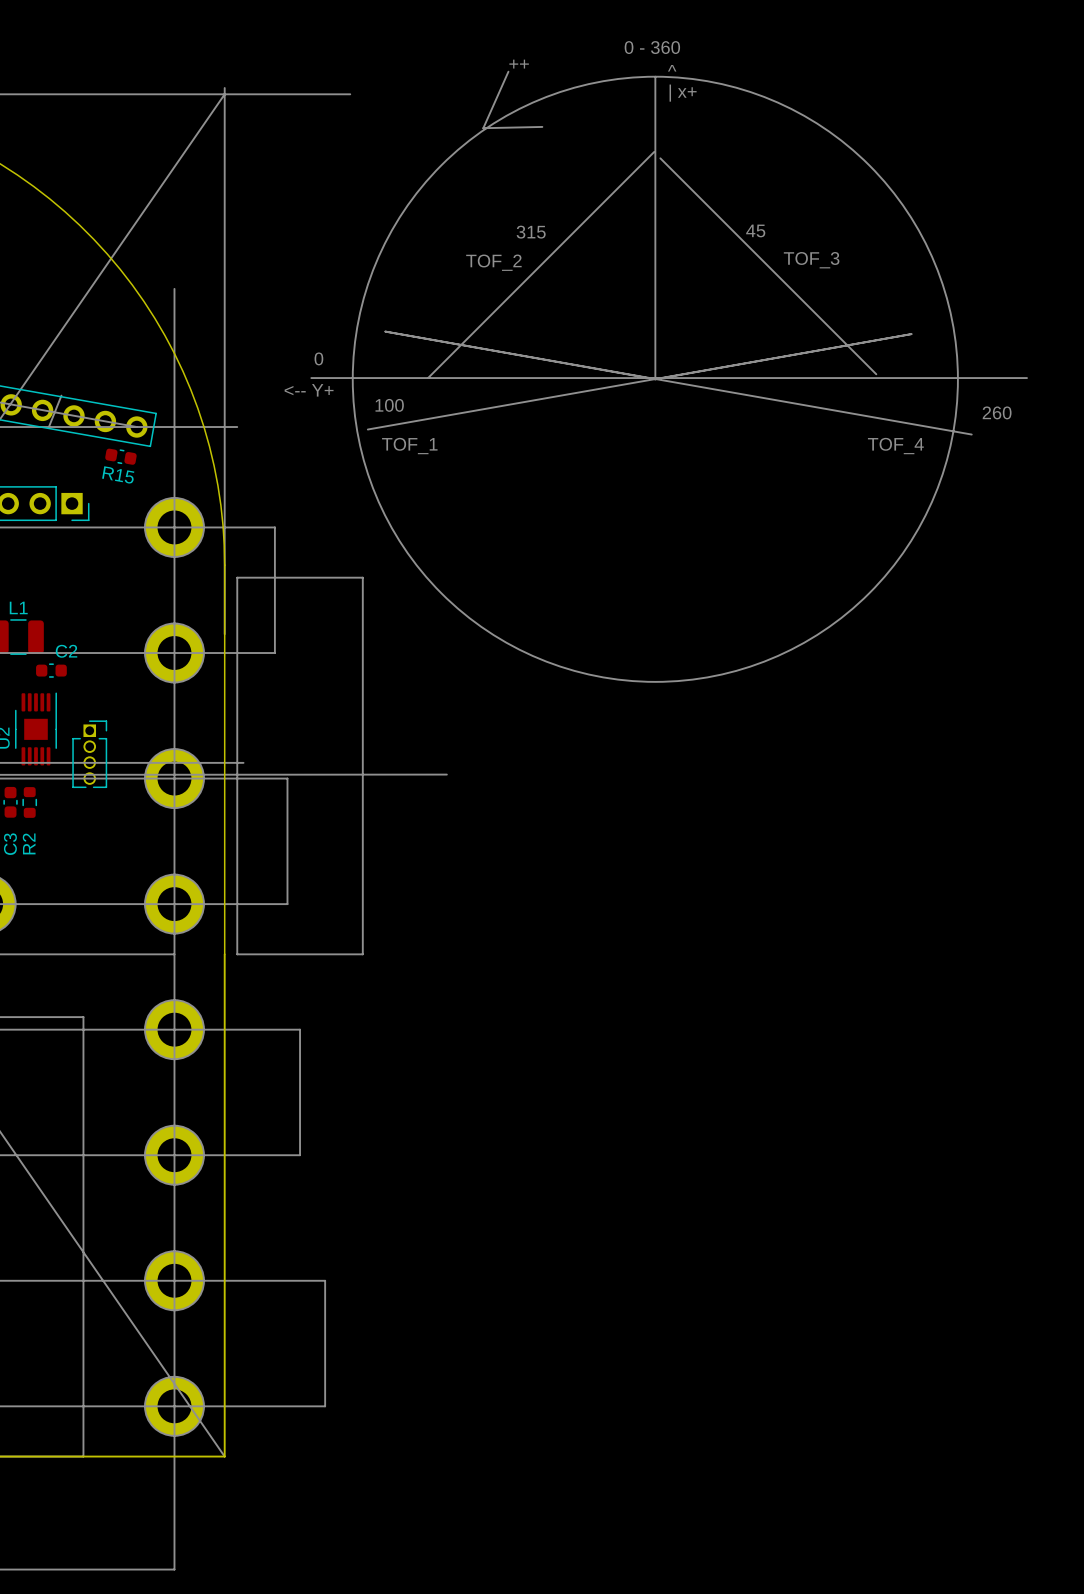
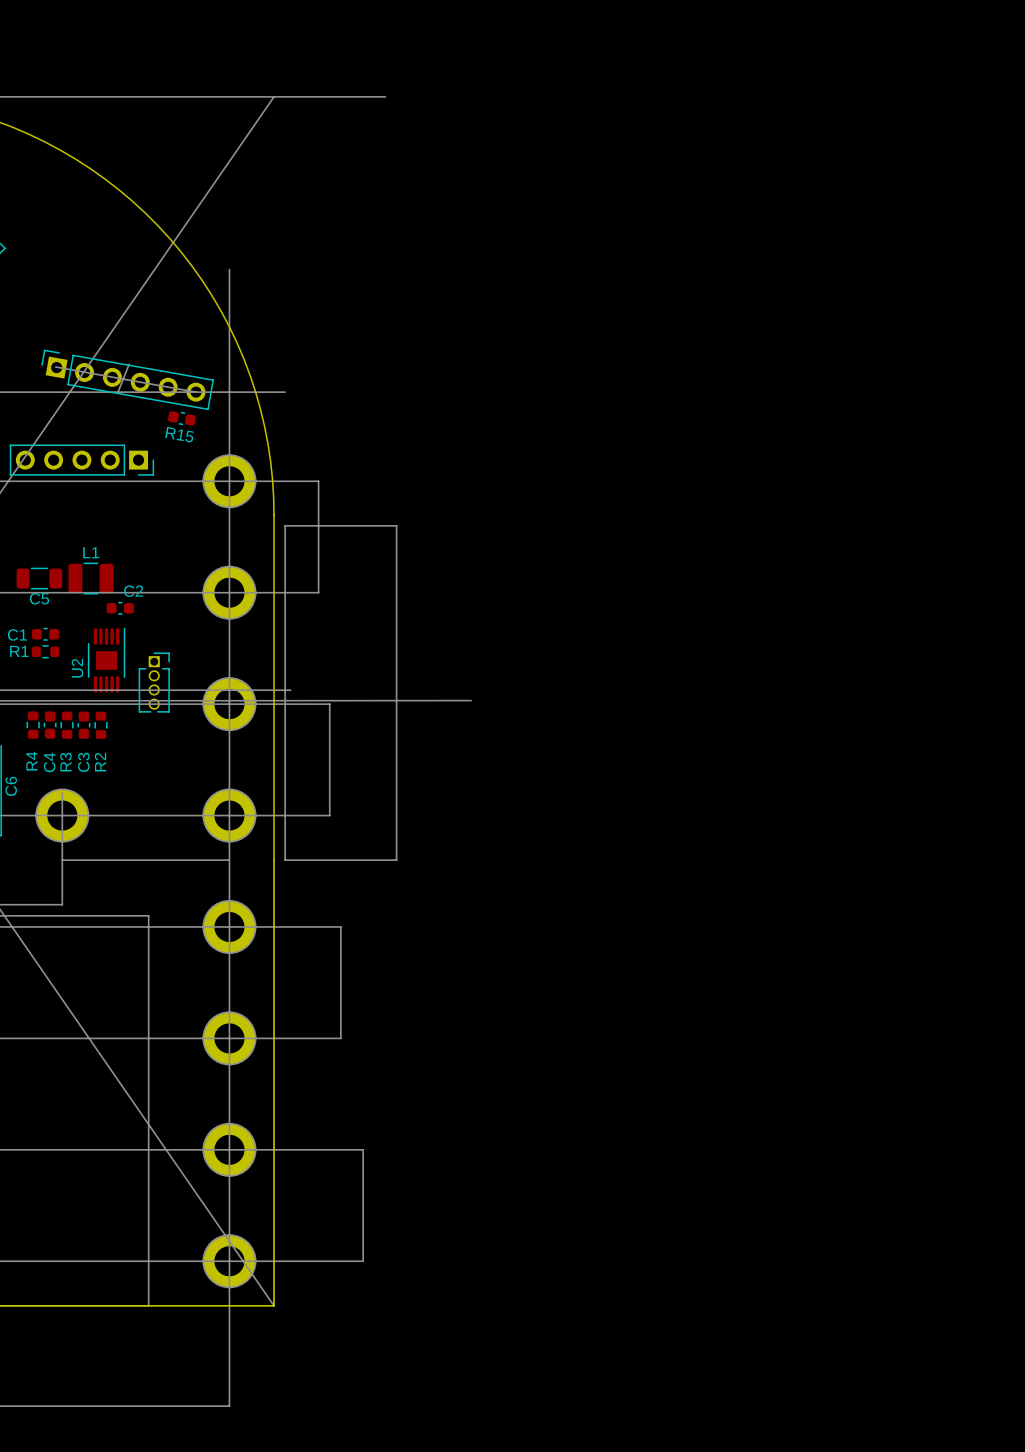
text: 0 - 360 (652, 47) -> none
text: ++ (519, 64) -> none
text: ^ (672, 68) -> none
line: (508, 71) (483, 128) (542, 126) -> none
drawing: [351, 75, 959, 683] -> none
line: (655, 76) (655, 379) -> none
line: (224, 88) (224, 634) -> none
text: | x+ (683, 93) -> none
line: (654, 152) (428, 378) -> none
line: (660, 158) (876, 374) -> none
text: 45 (755, 230) -> none
text: 315 (531, 232) -> none
text: TOF_3 (811, 260) -> none
text: TOF_2 (493, 262) -> none
text: 0 (318, 358) -> none
line: (311, 378) (1026, 378) -> none
line: (655, 379) (385, 331) (971, 434) -> none
line: (655, 379) (911, 334) (367, 429) -> none
text: <-- Y+ (309, 390) -> none
text: 100 (389, 405) -> none
text: 260 (997, 412) -> none
text: TOF_1 (409, 446) -> none
text: TOF_4 (895, 446) -> none

